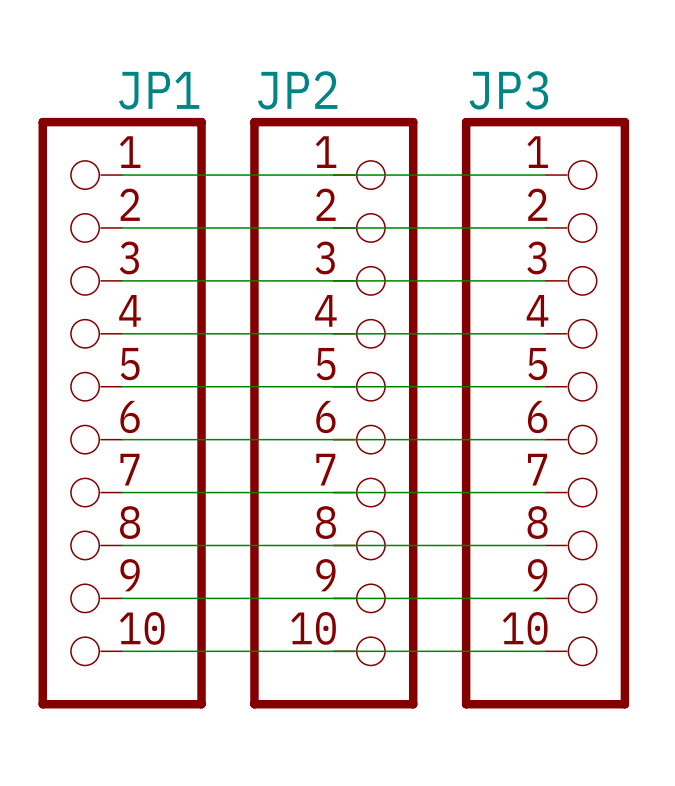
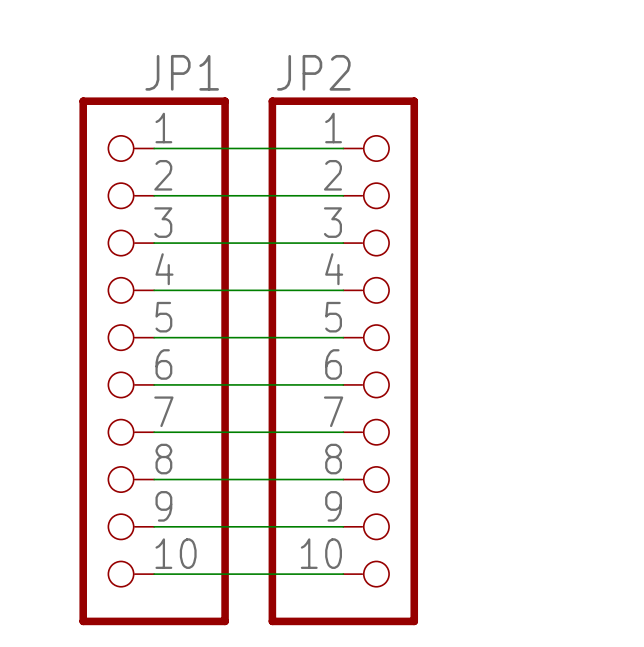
wire: (333, 175) (545, 175) -> none
wire: (333, 227) (545, 227) -> none
wire: (333, 280) (545, 280) -> none
wire: (333, 333) (545, 333) -> none
wire: (333, 386) (545, 386) -> none
JP3: (545, 413) -> none
wire: (333, 439) (545, 439) -> none
wire: (333, 492) (545, 492) -> none
wire: (333, 545) (545, 545) -> none
wire: (333, 598) (545, 598) -> none
wire: (333, 651) (545, 651) -> none

